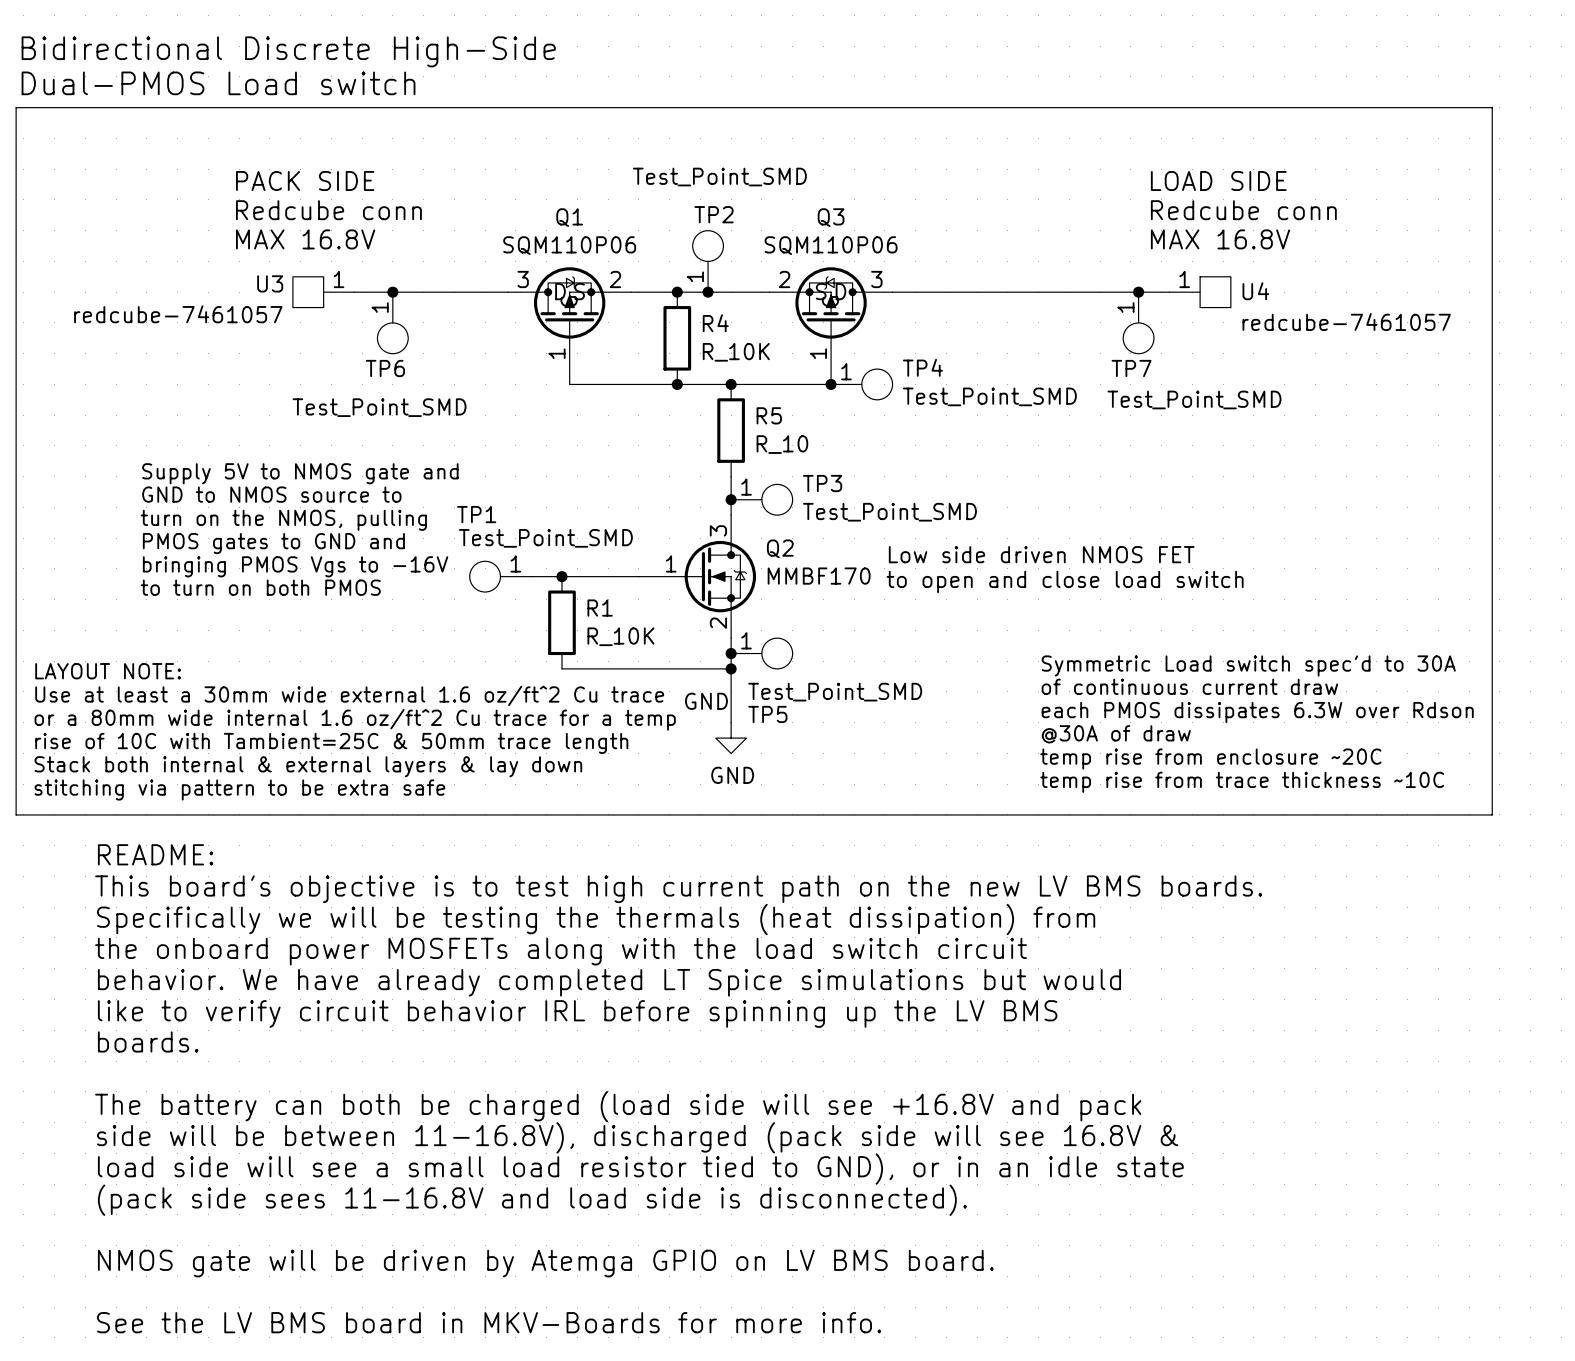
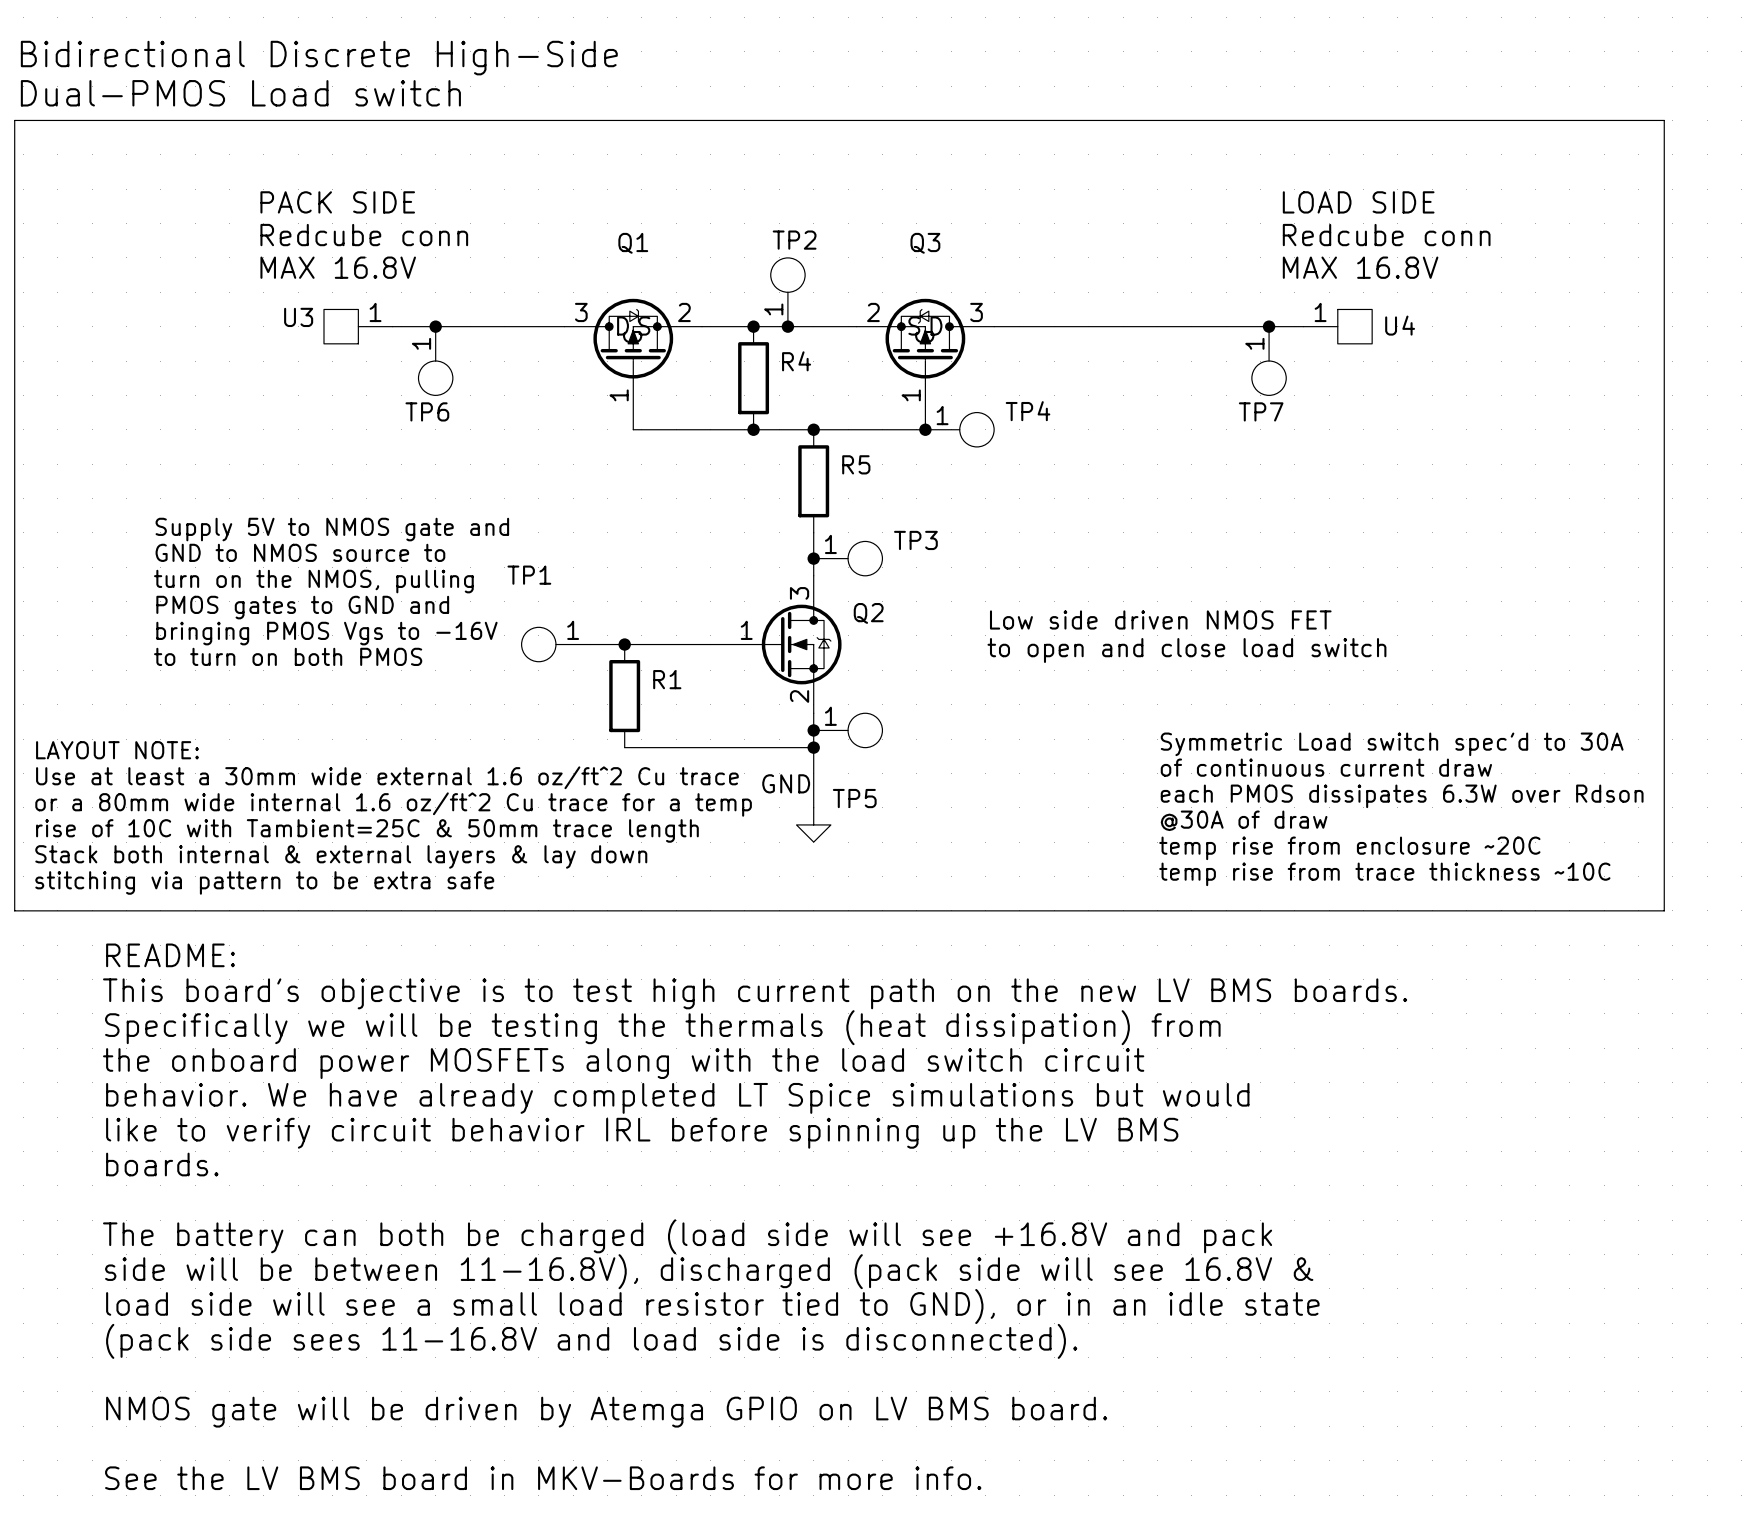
TP2 value: Test_Point_SMD (719, 177) -> none
Q1 value: SQM110P06 (569, 245) -> none
Q3 value: SQM110P06 (831, 245) -> none
U3 value: redcube-7461057 (178, 314) -> none
U4 value: redcube-7461057 (1346, 321) -> none
R4 value: R_10K (736, 352) -> none
TP4 value: Test_Point_SMD (989, 396) -> none
TP7 value: Test_Point_SMD (1194, 399) -> none
TP6 value: Test_Point_SMD (379, 407) -> none
R5 value: R_10 (782, 444) -> none
TP3 value: Test_Point_SMD (889, 512) -> none
TP1 value: Test_Point_SMD (545, 538) -> none
Q2 value: MMBF170 (819, 576) -> none
R1 value: R_10K (620, 636) -> none
TP5 value: Test_Point_SMD (835, 692) -> none
power symbol text: GND (732, 775) -> none

